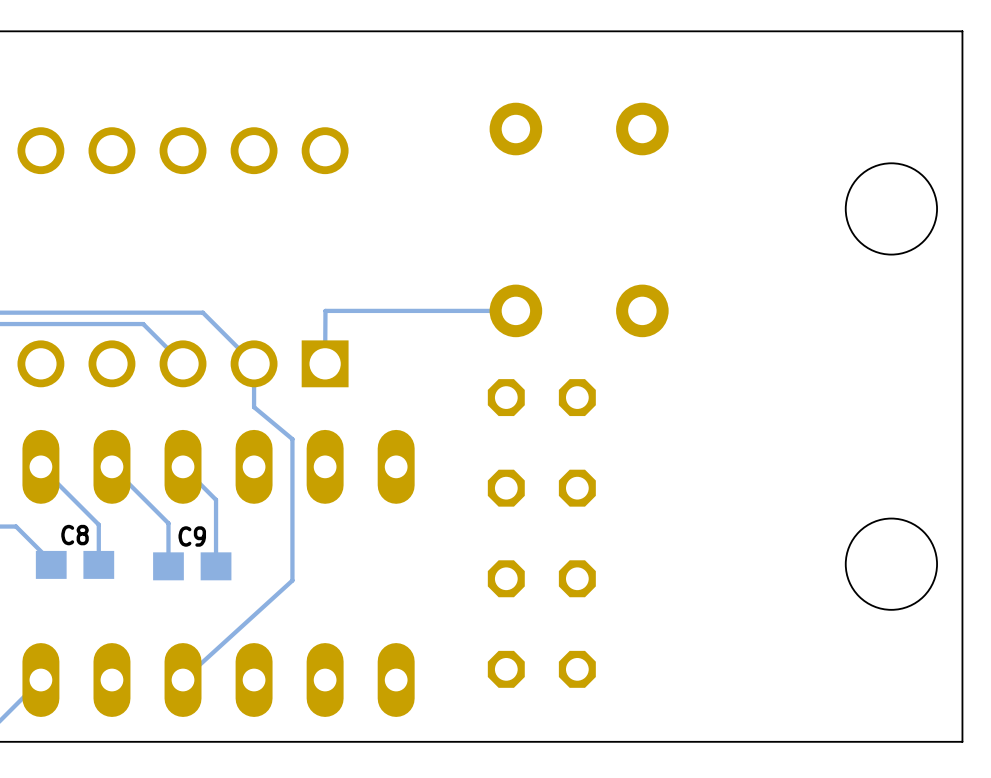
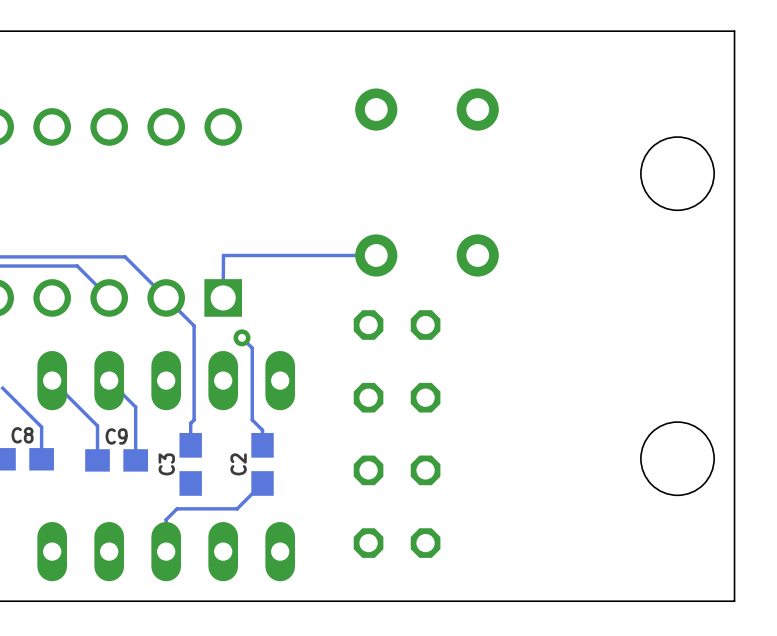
track: (254, 363) (254, 407) (292, 439) (292, 580) (183, 680) -> (166, 297) (194, 325) (194, 419) (190, 423) (190, 445)
track: none -> (242, 337) (252, 348) (252, 419) (262, 430) (262, 445)
via: none -> (242, 337)
C3: none -> (190, 464)
C2: none -> (262, 464)
track: none -> (262, 483) (237, 508) (177, 508) (166, 519) (166, 551)

